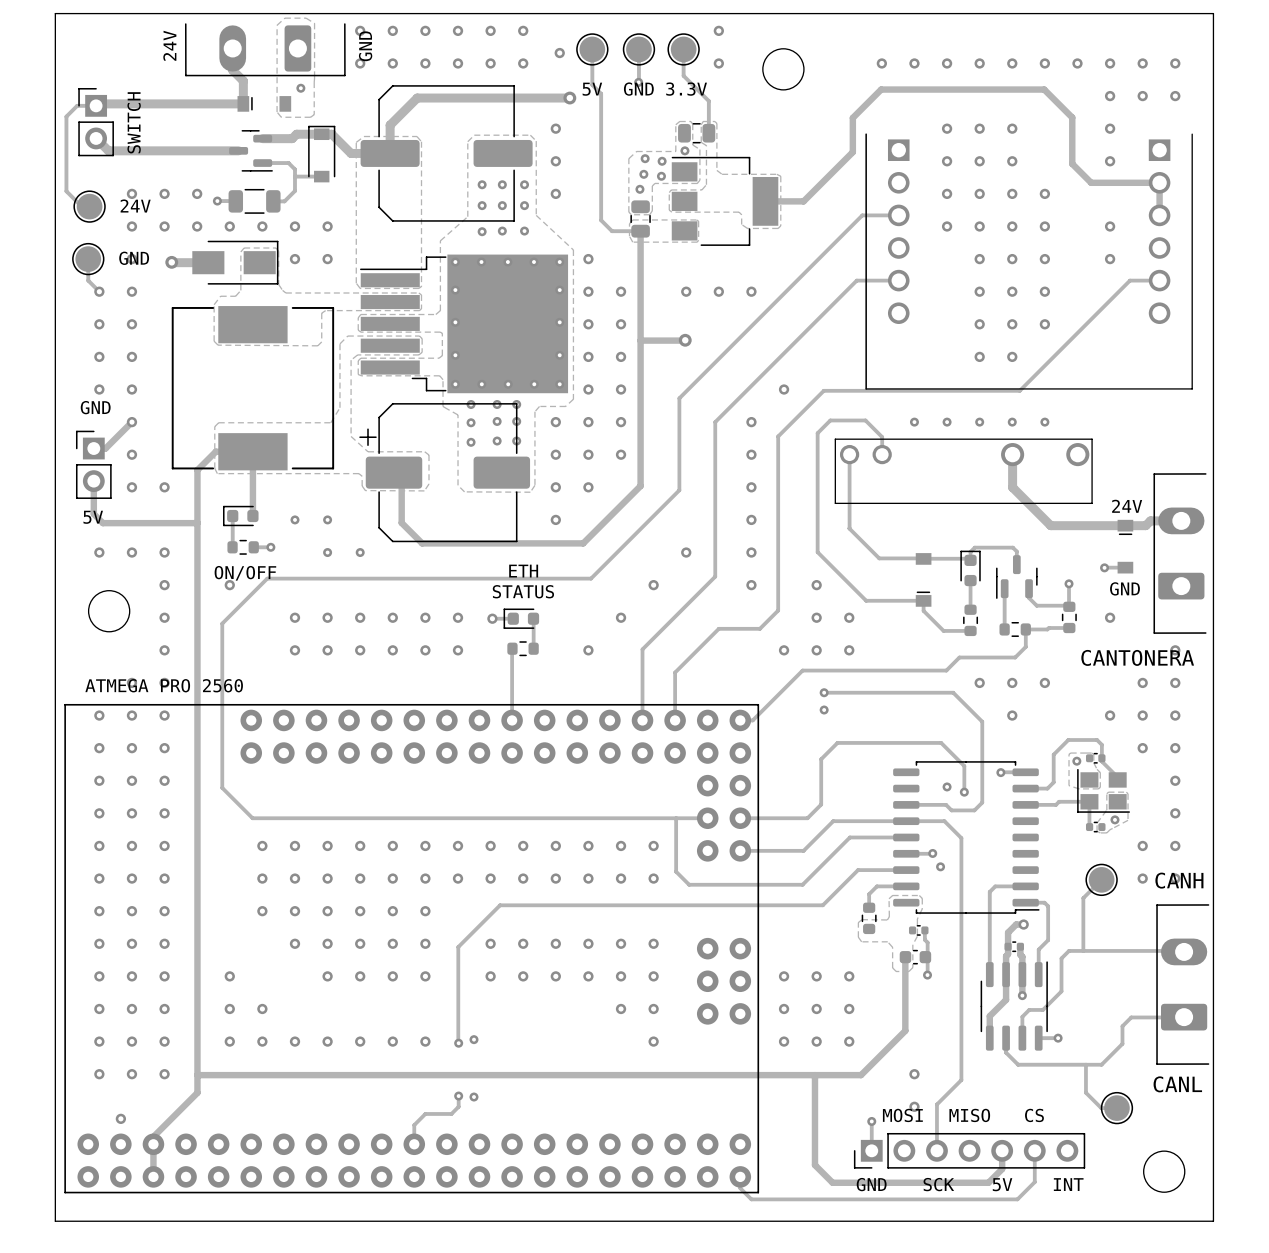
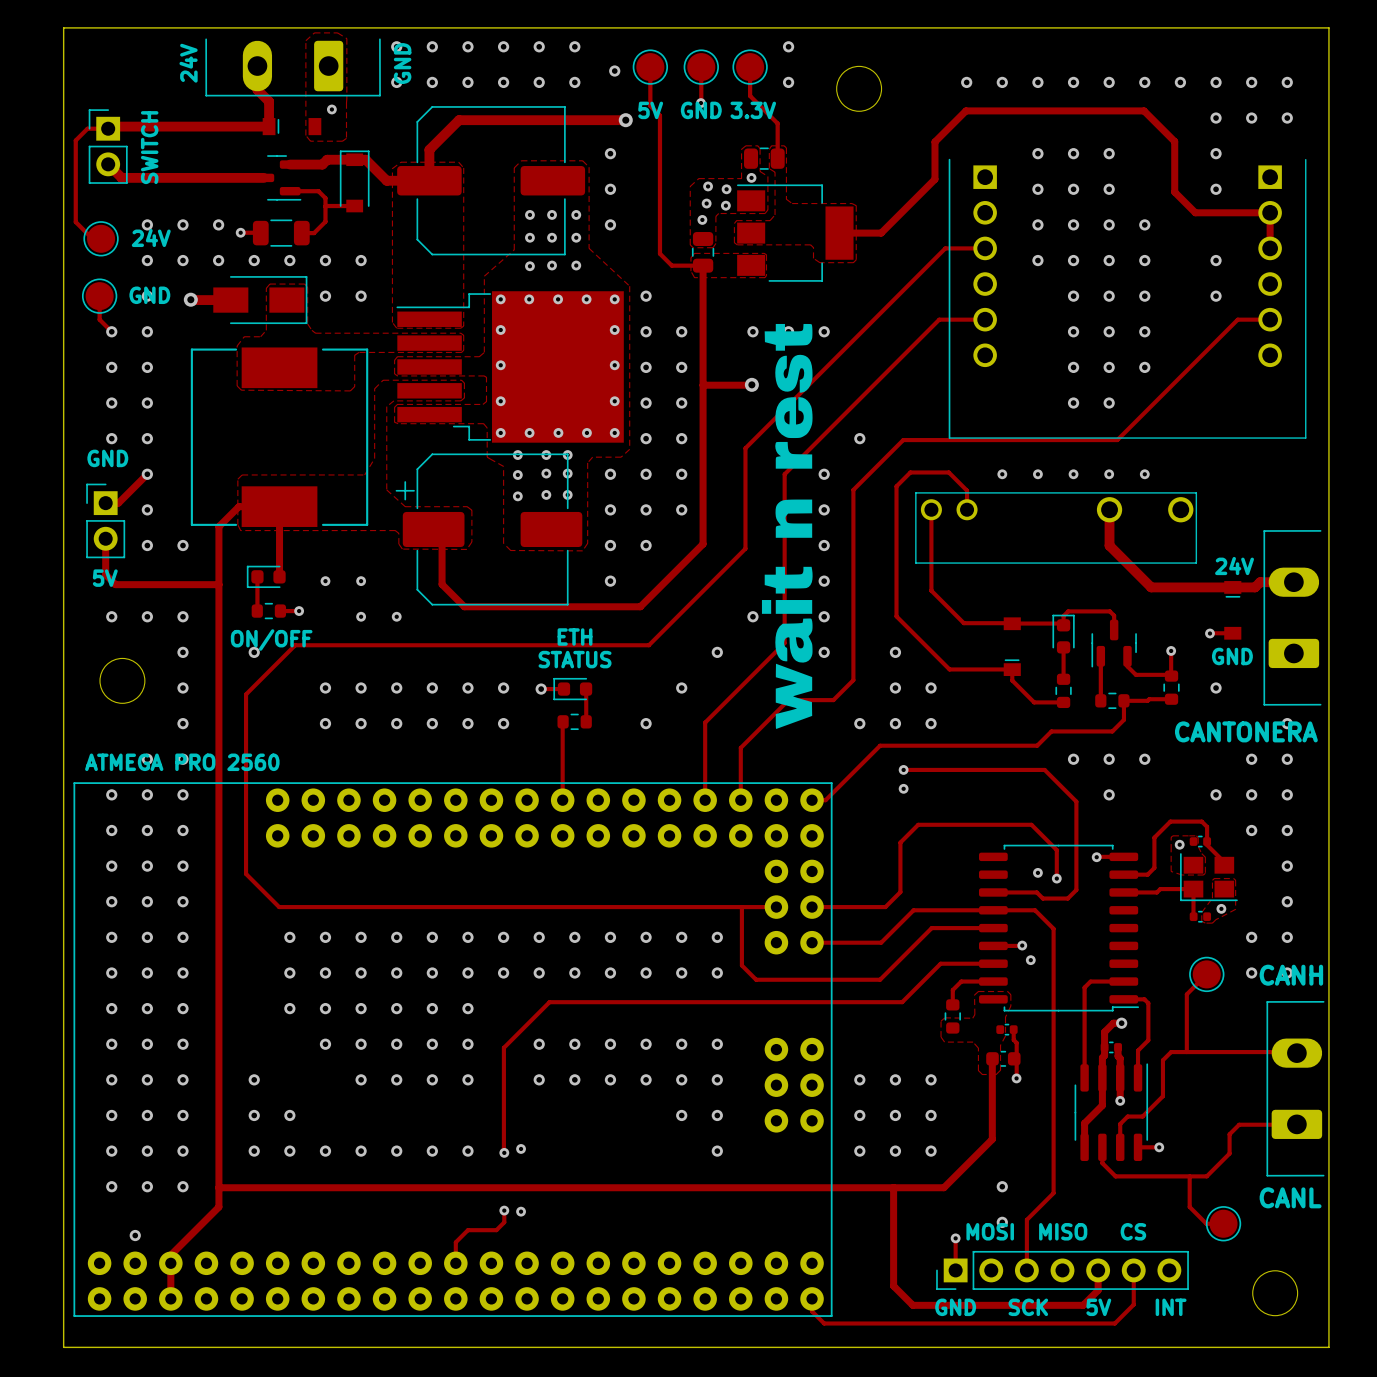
drawing: none -> [761, 323, 813, 729]

